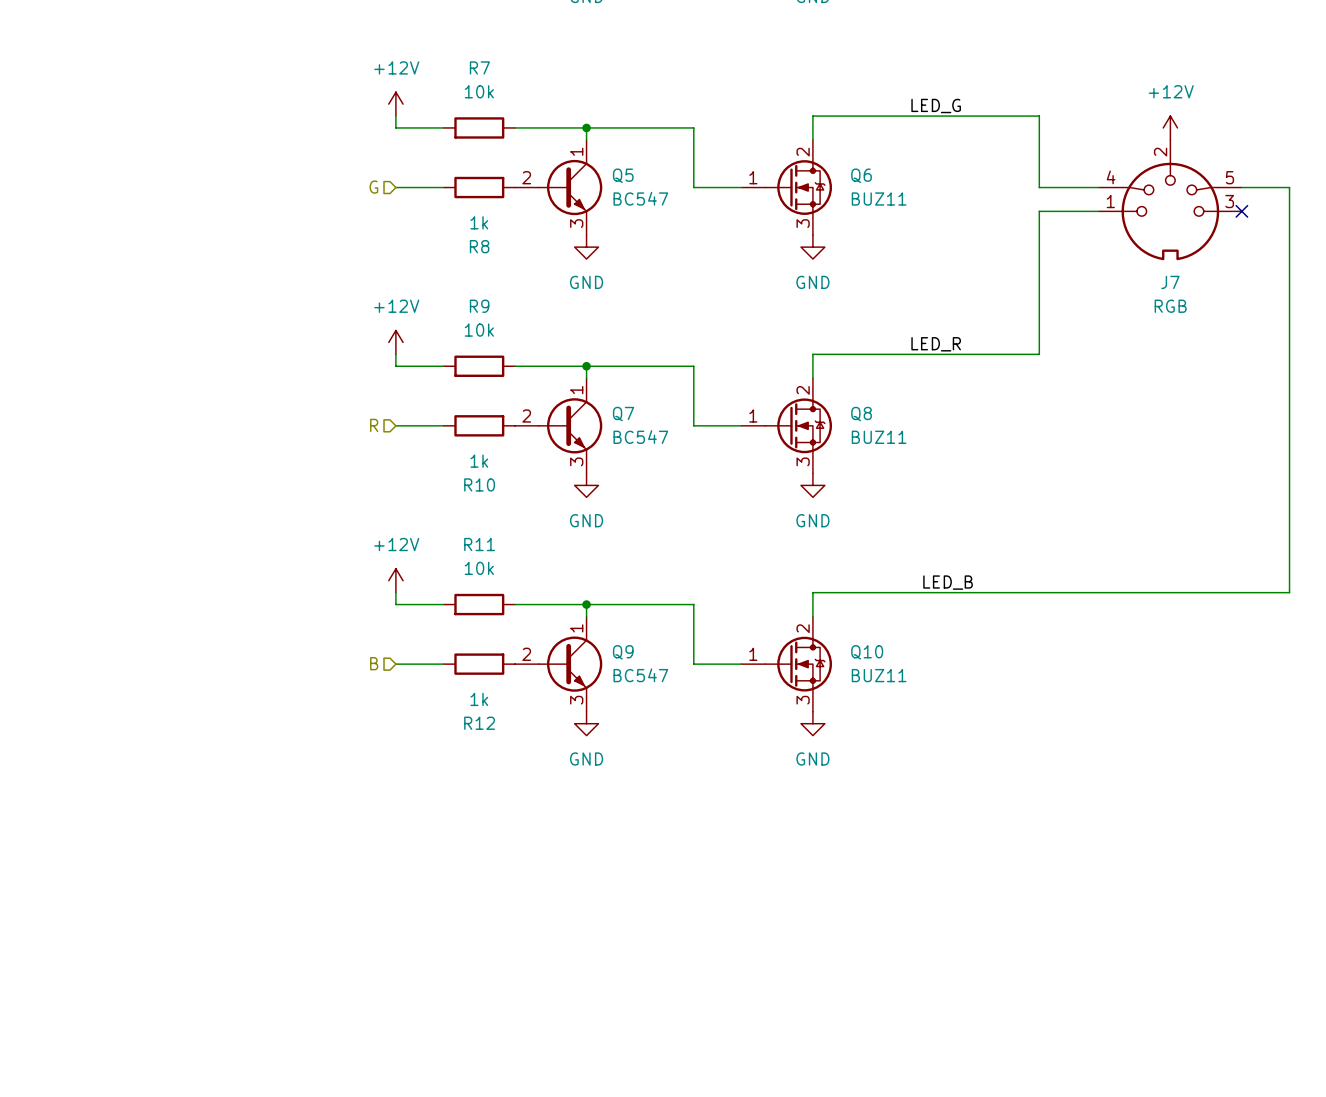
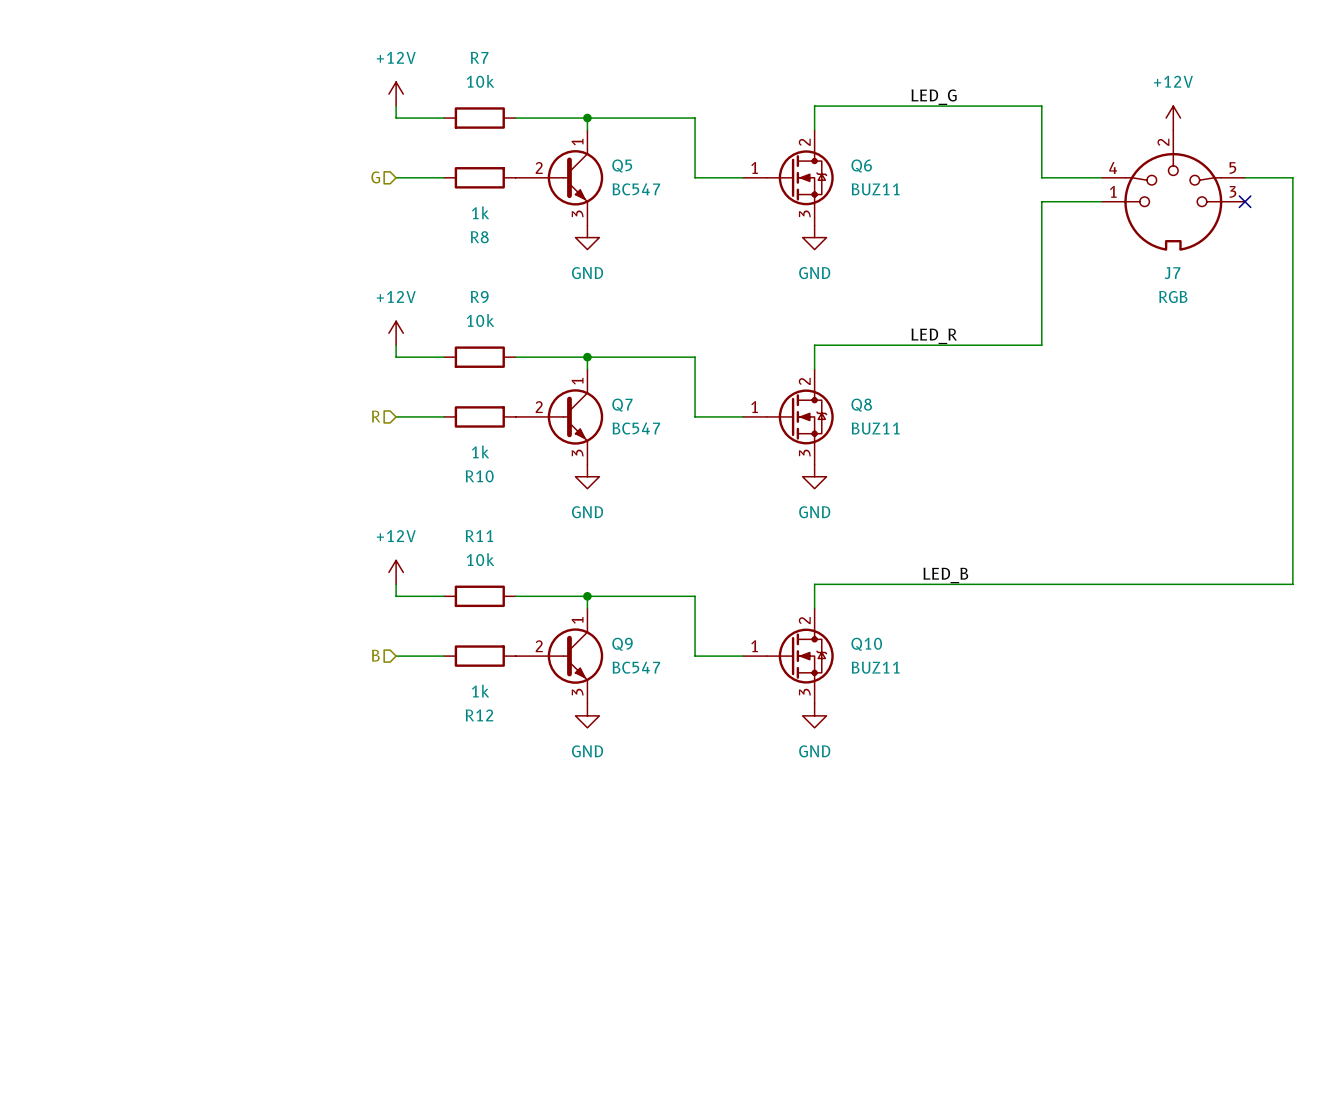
Q5 symbol: [515, 139, 603, 236] -> [515, 129, 604, 226]
Q7 symbol: [515, 378, 603, 474] -> [515, 369, 604, 465]
Q9 symbol: [515, 616, 603, 712] -> [515, 608, 604, 704]

